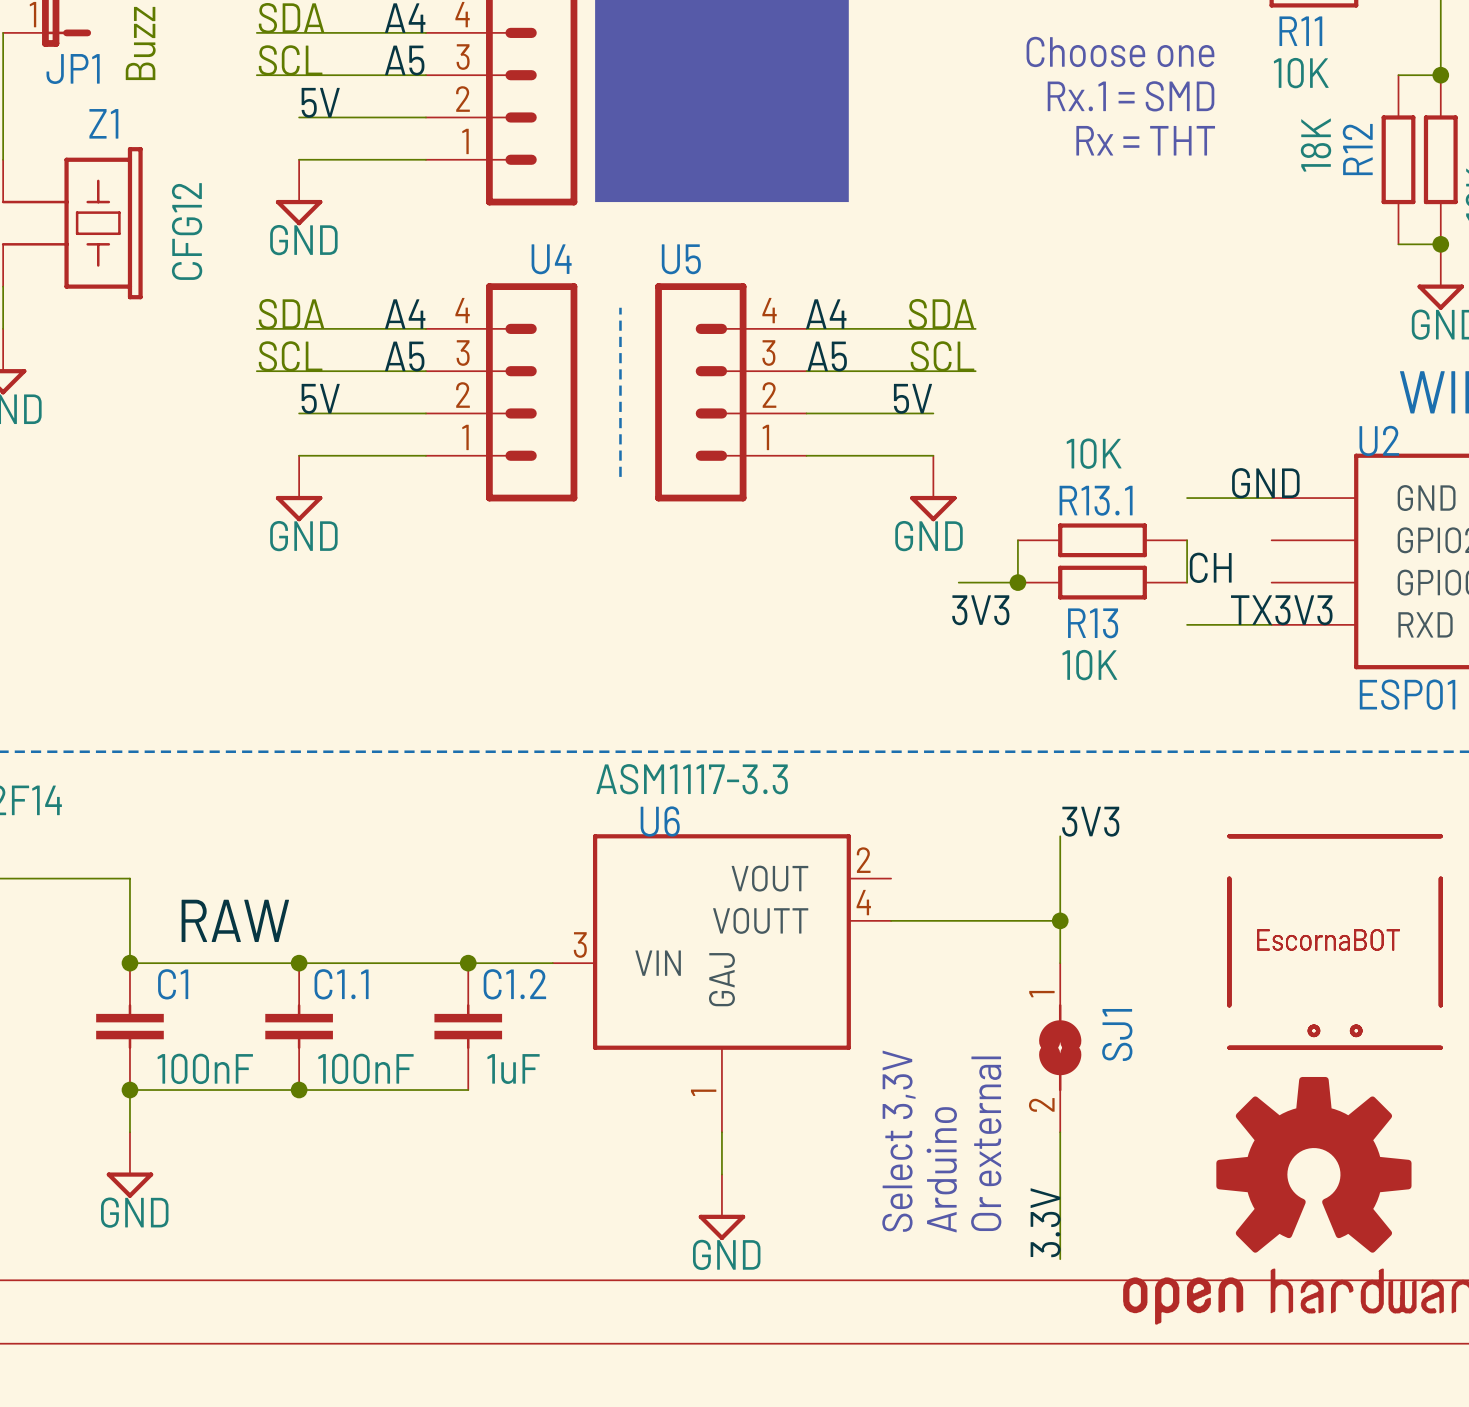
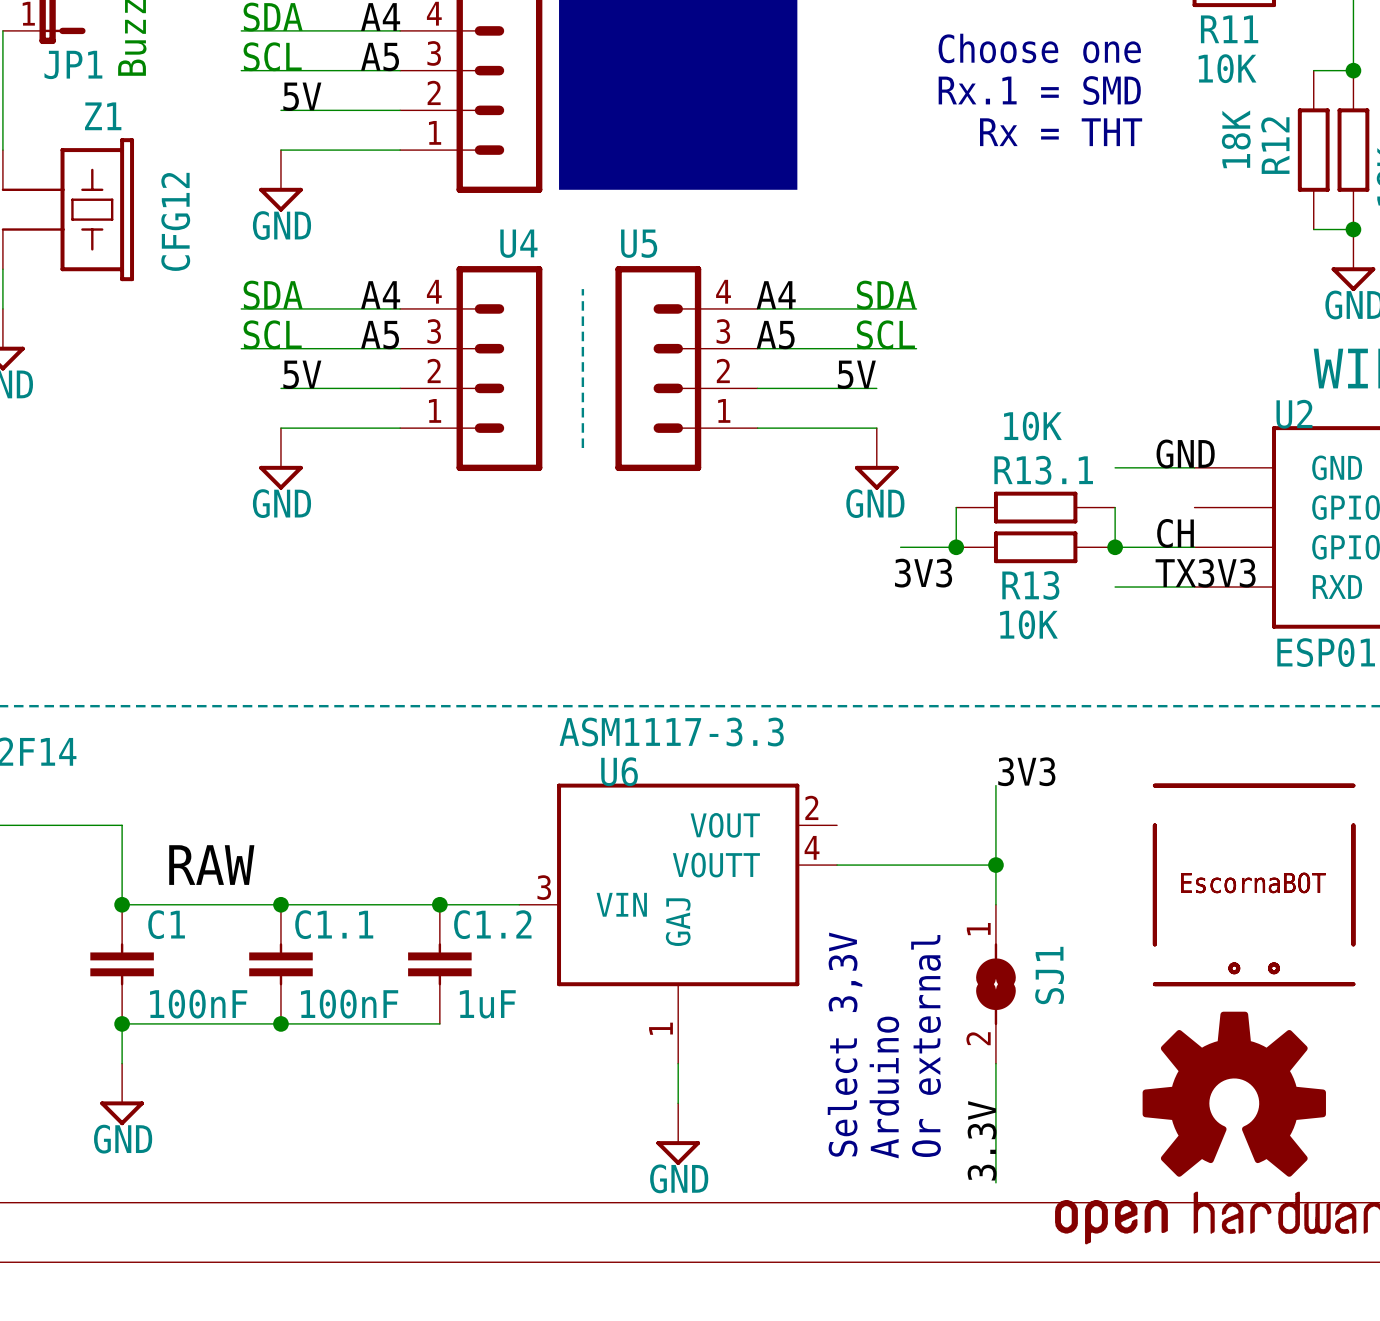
label position: CH (1210, 567) -> CH (1175, 533)
wire: none -> (1115, 547) (1194, 547)
junction: none -> (1115, 547)

